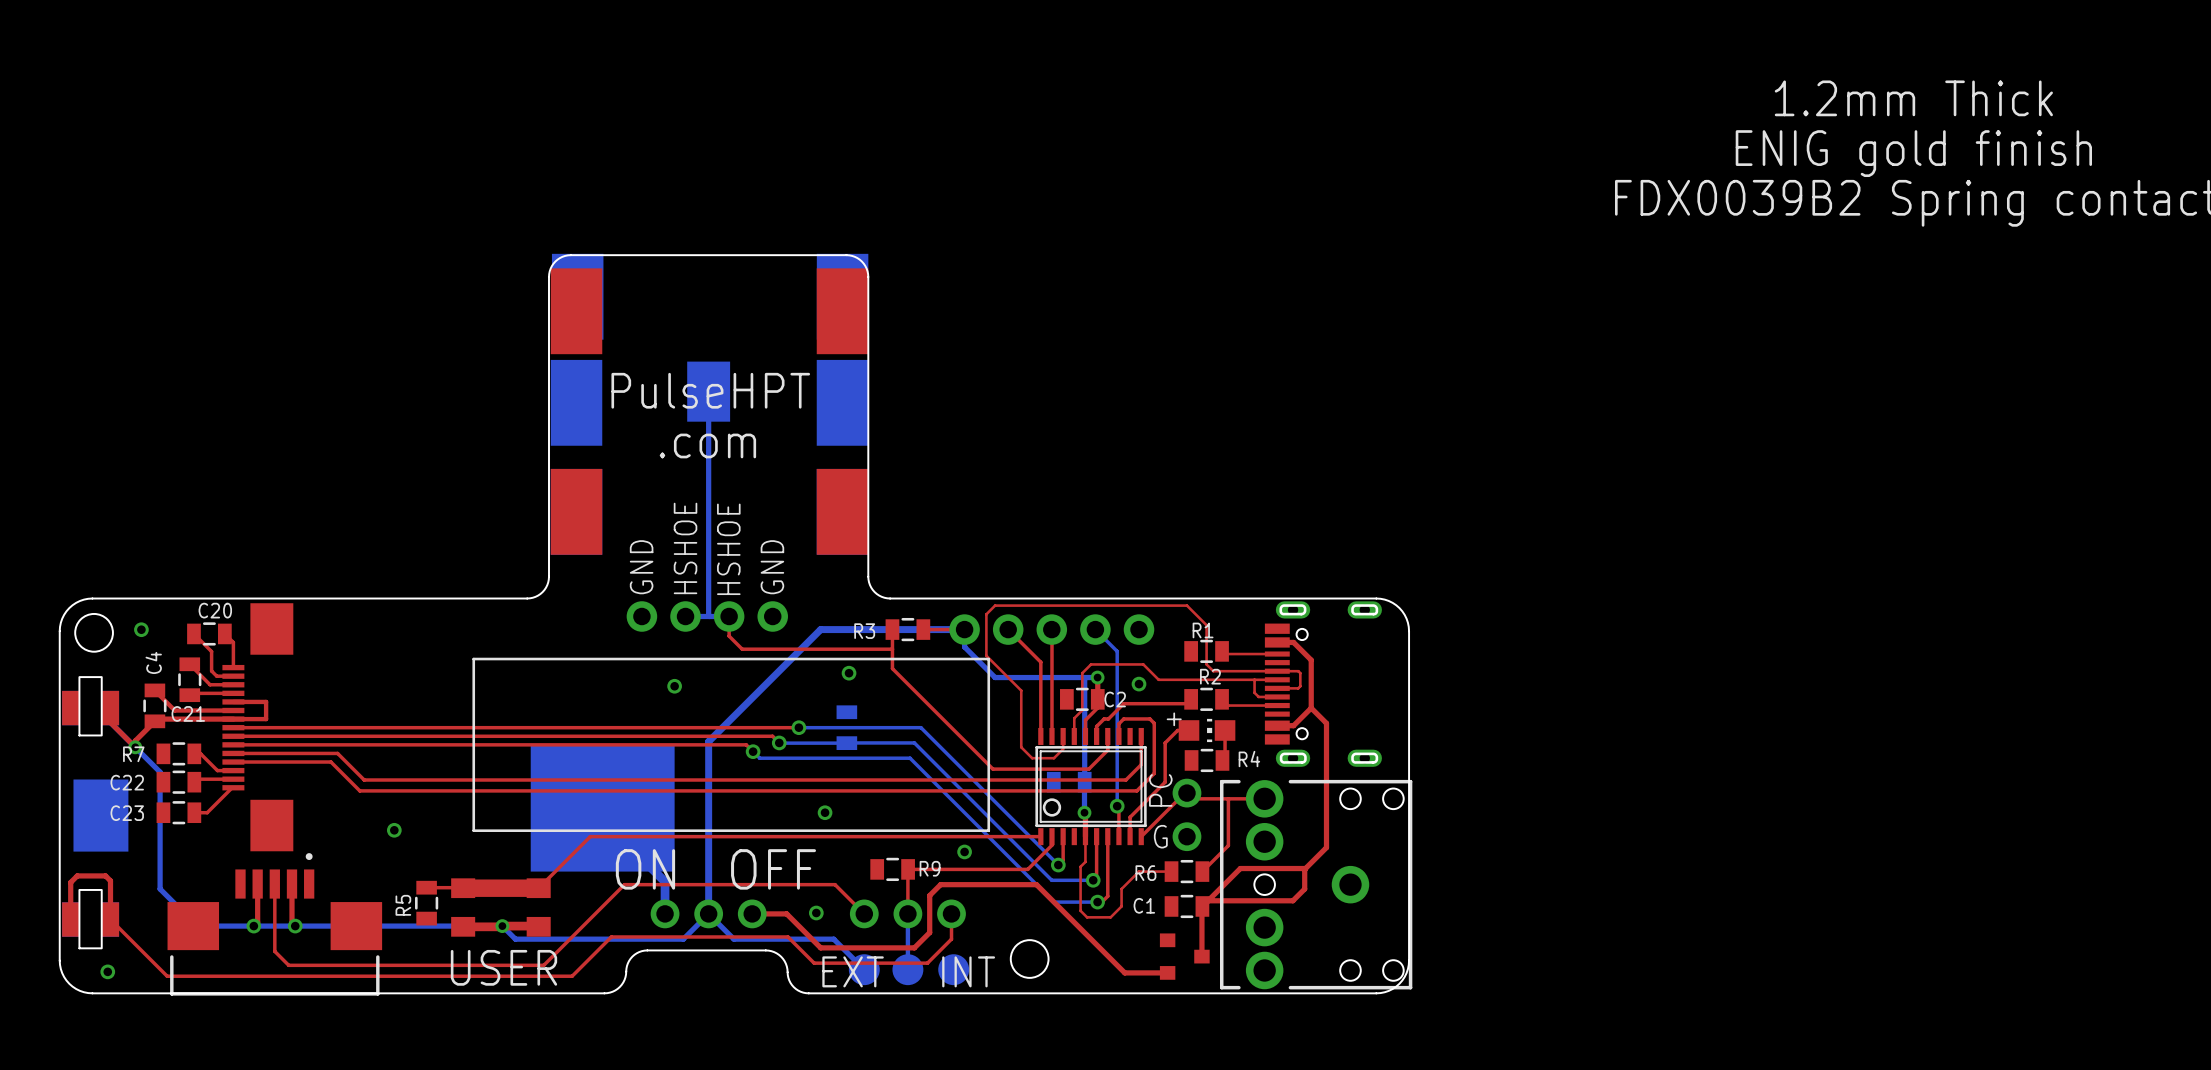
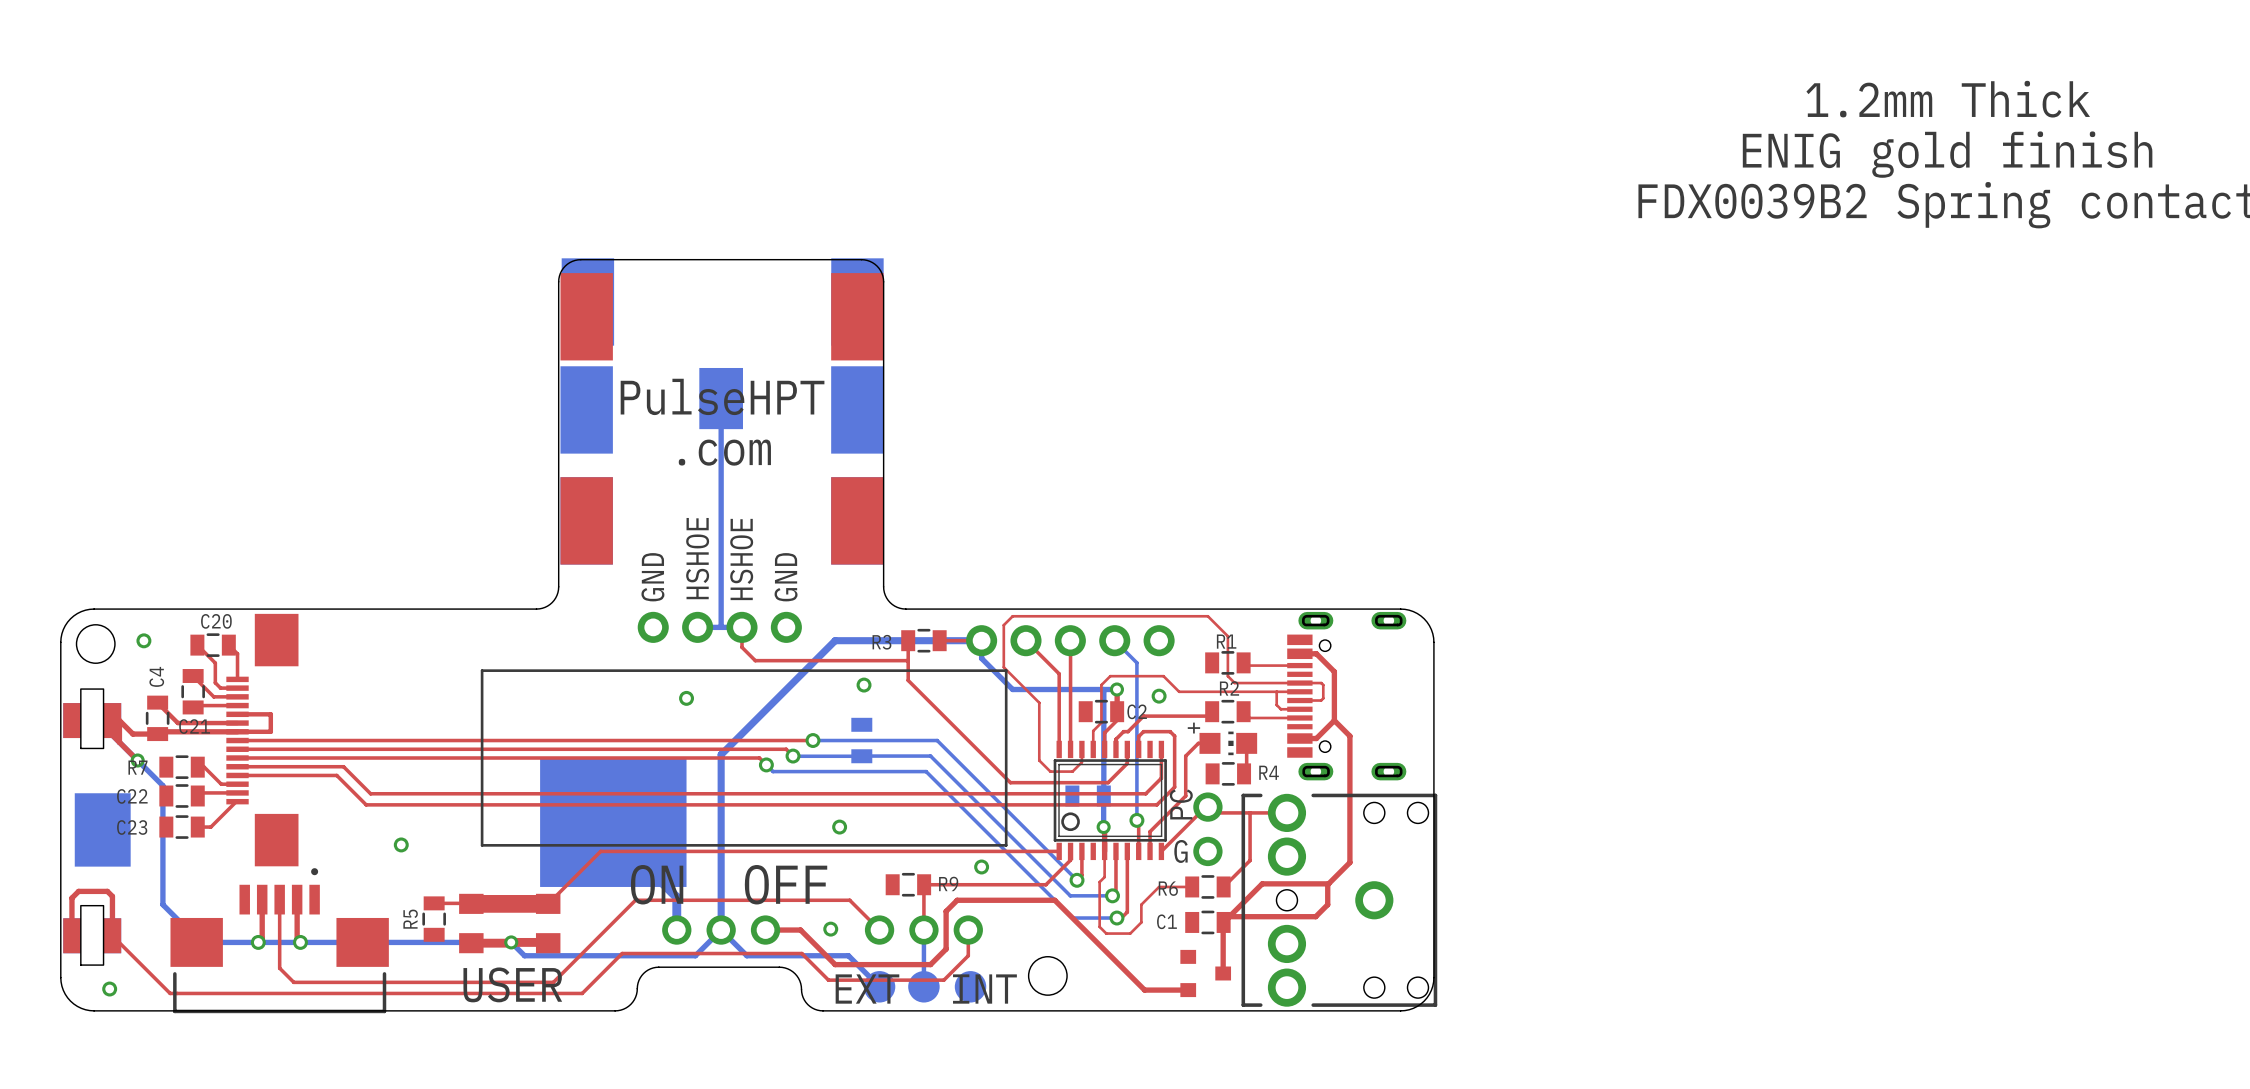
top track: (154, 721) (135, 740) (135, 747) -> (157, 734) (132, 734) (119, 720) (119, 742)

